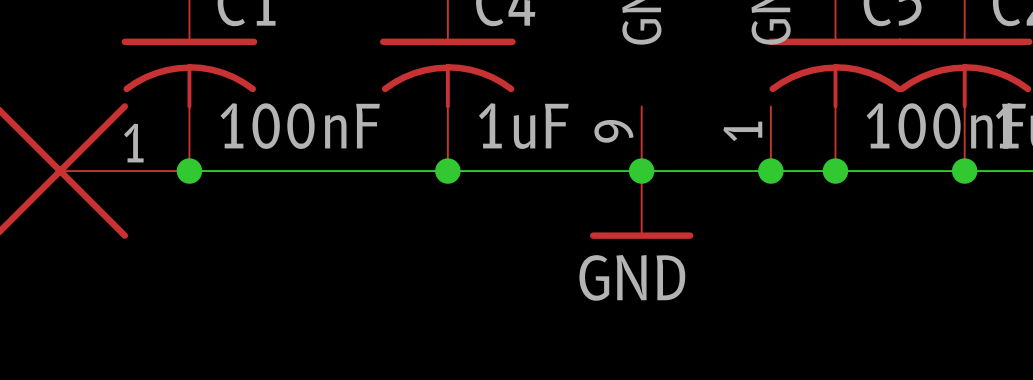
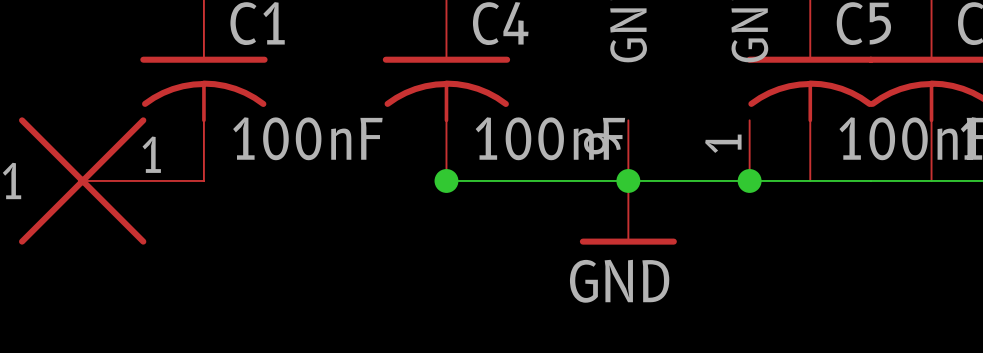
C4 value: 1uF (523, 126) -> 100nF (550, 138)
wire: (189, 171) (447, 171) -> none
junction: (189, 171) -> none
junction: (835, 171) -> none
junction: (964, 171) -> none

